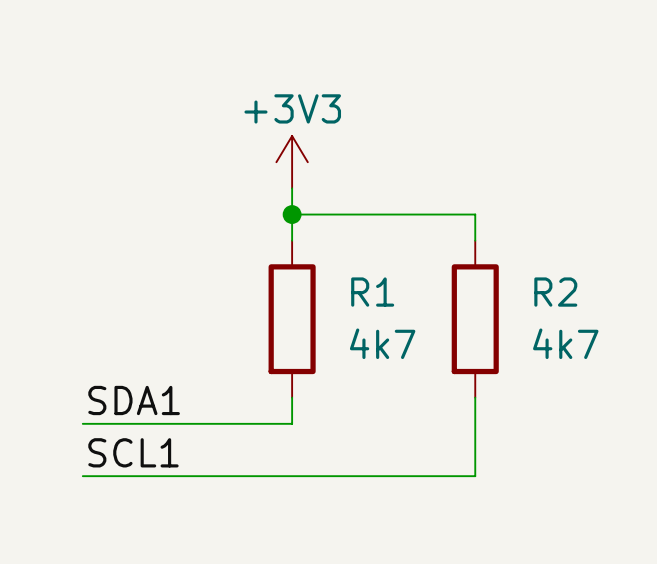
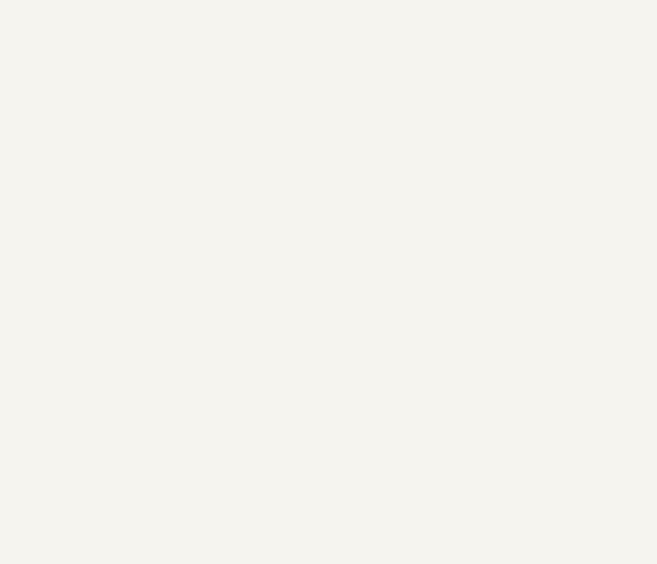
power symbol: +3V3 (292, 162) -> none
wire: (292, 188) (292, 240) -> none
wire: (292, 214) (475, 214) (475, 240) -> none
junction: (292, 214) -> none
R1: 4k7 (292, 319) -> none
R2: 4k7 (475, 319) -> none
wire: (292, 397) (292, 423) (82, 423) -> none
wire: (475, 397) (475, 476) (82, 476) -> none
label: SDA1 (134, 400) -> none
label: SCL1 (133, 452) -> none

